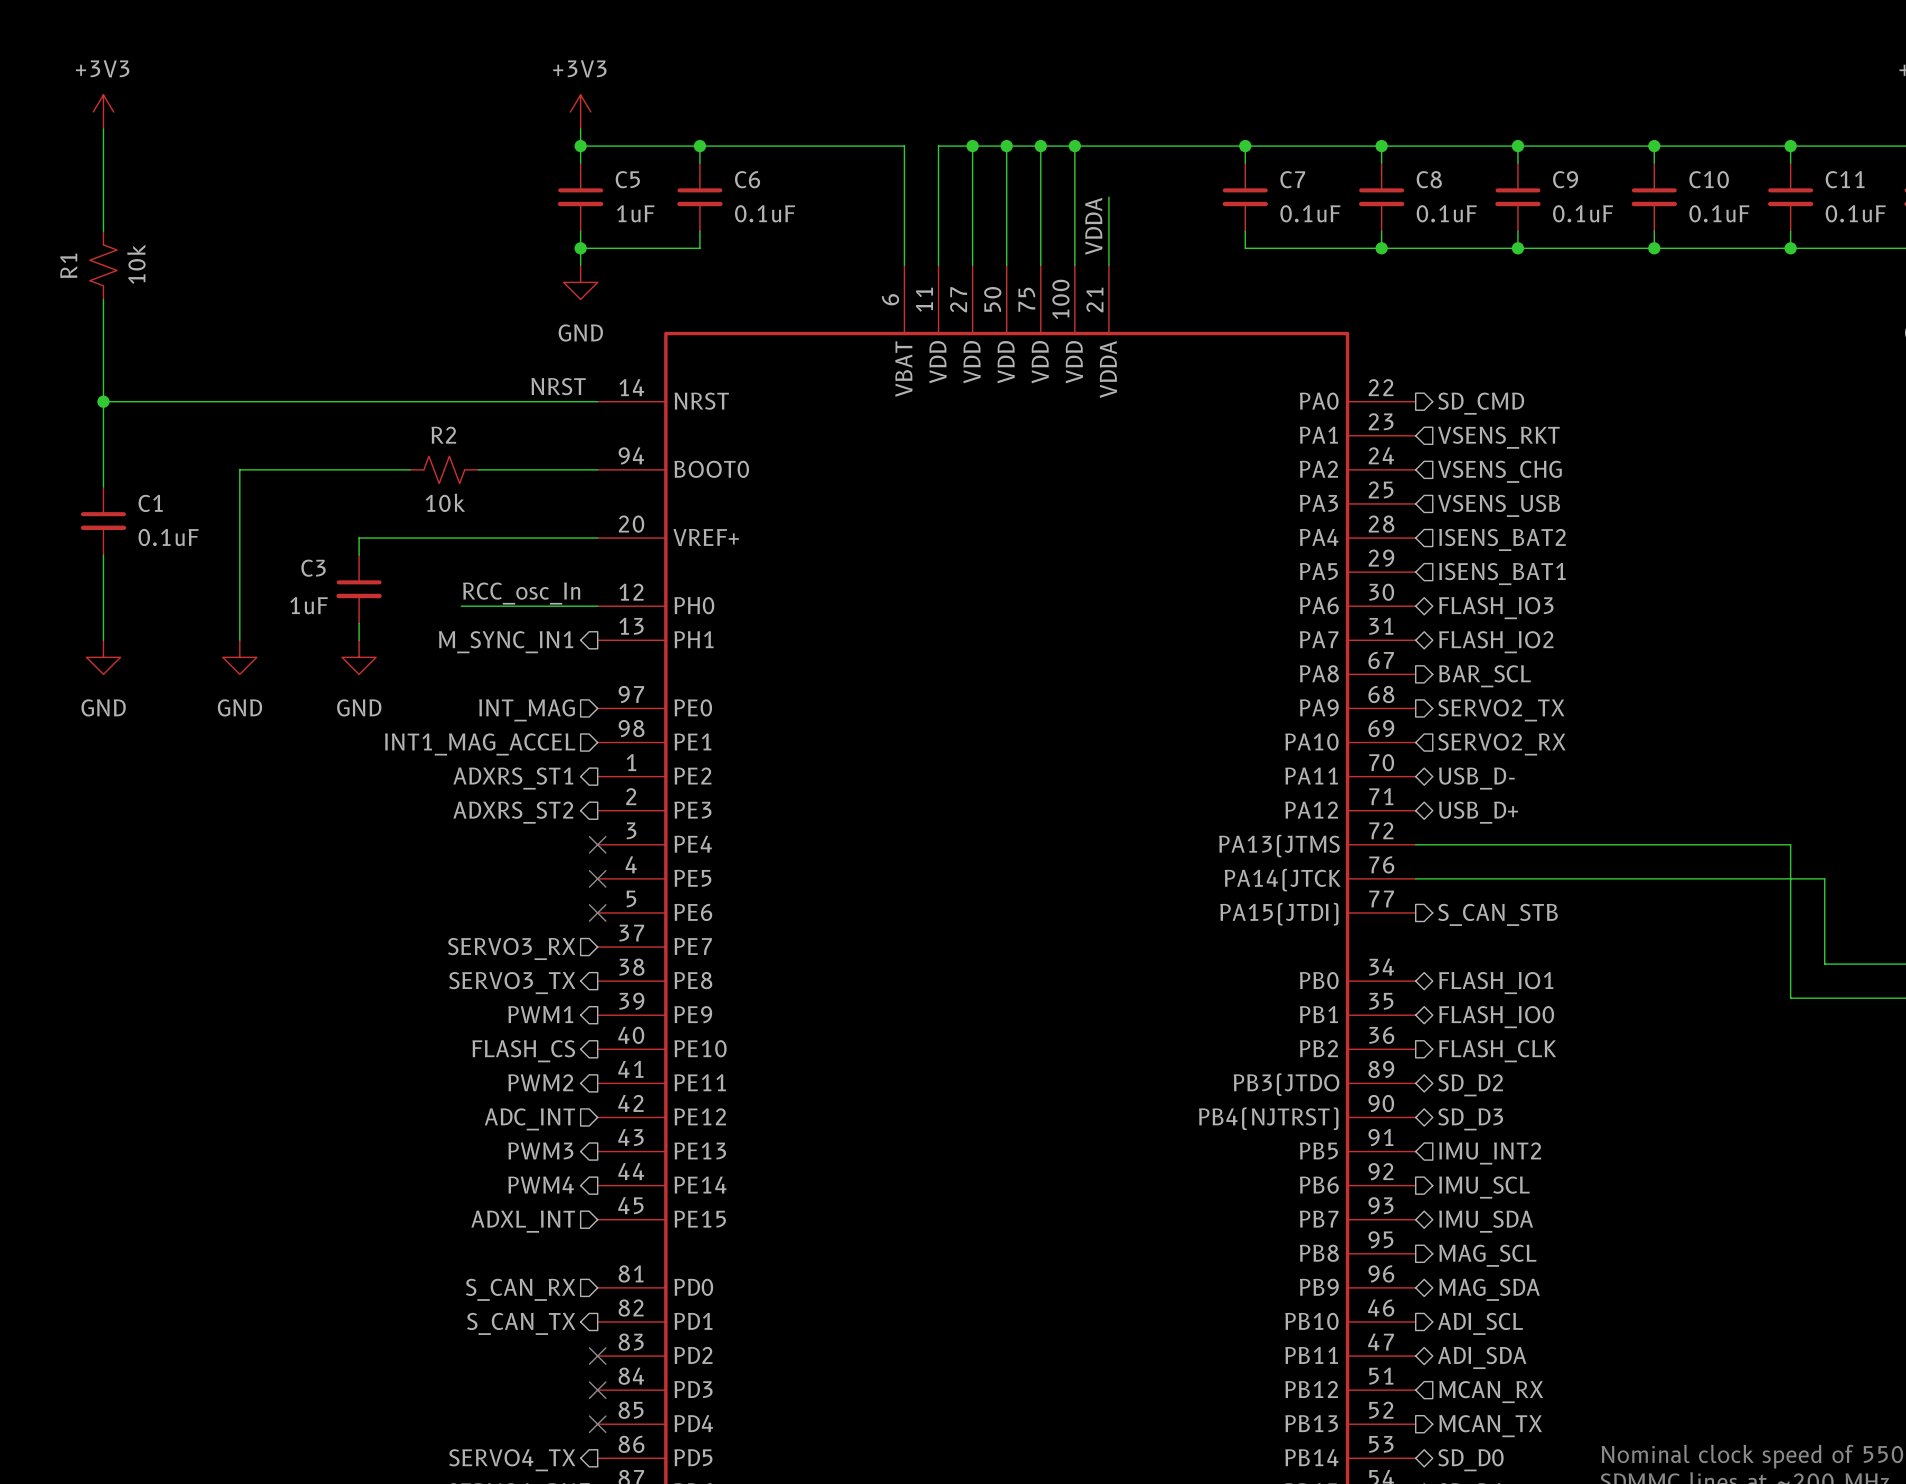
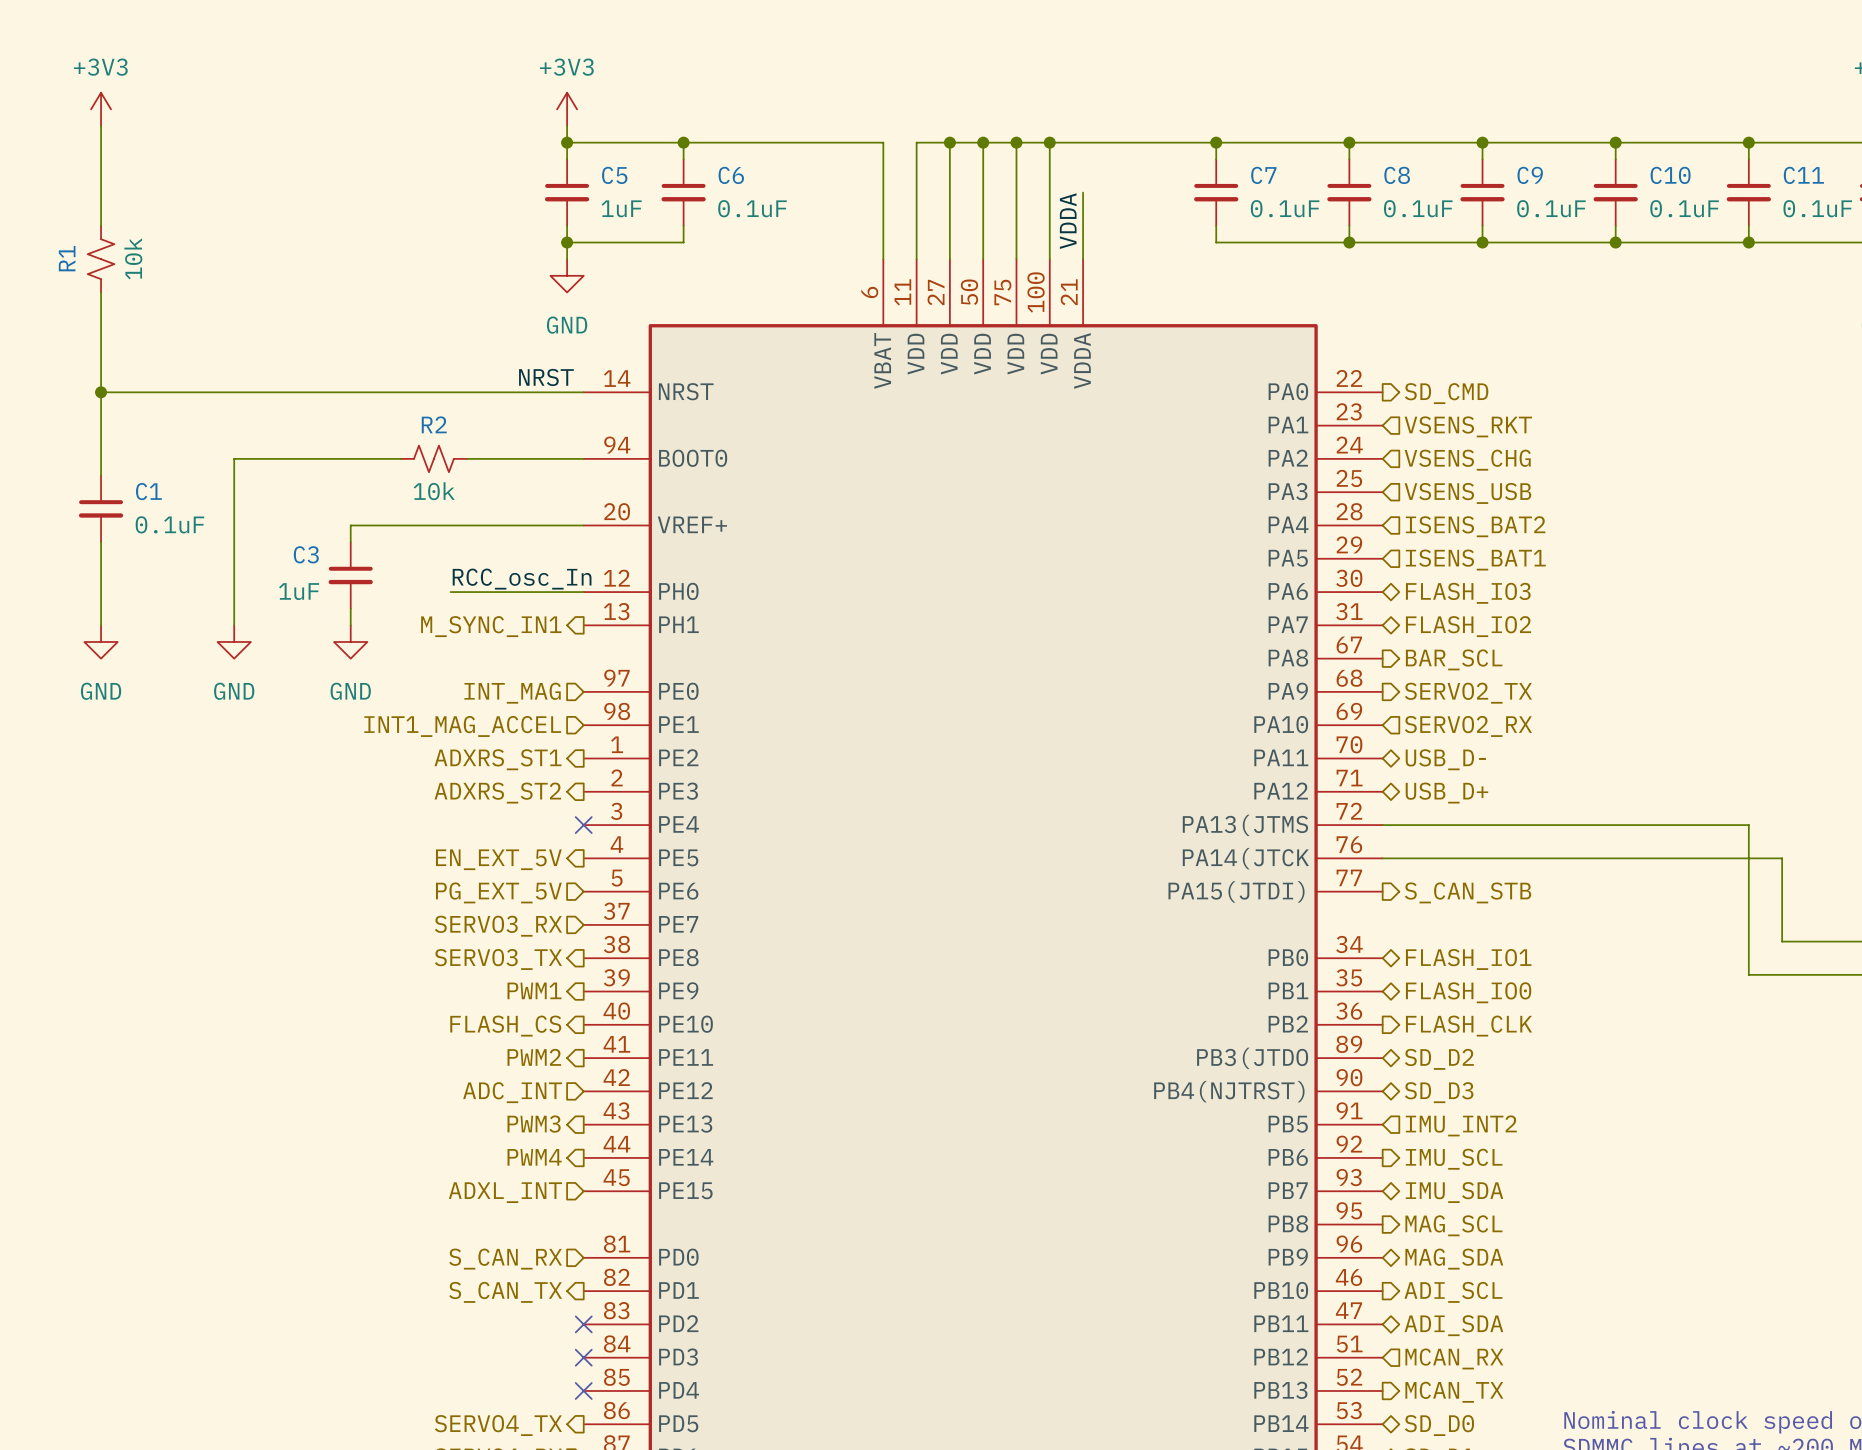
no-connect mark: (597, 878) -> none
hierarchical label: none -> EN_EXT_5V (498, 859)
no-connect mark: (597, 912) -> none
hierarchical label: none -> PG_EXT_5V (498, 892)

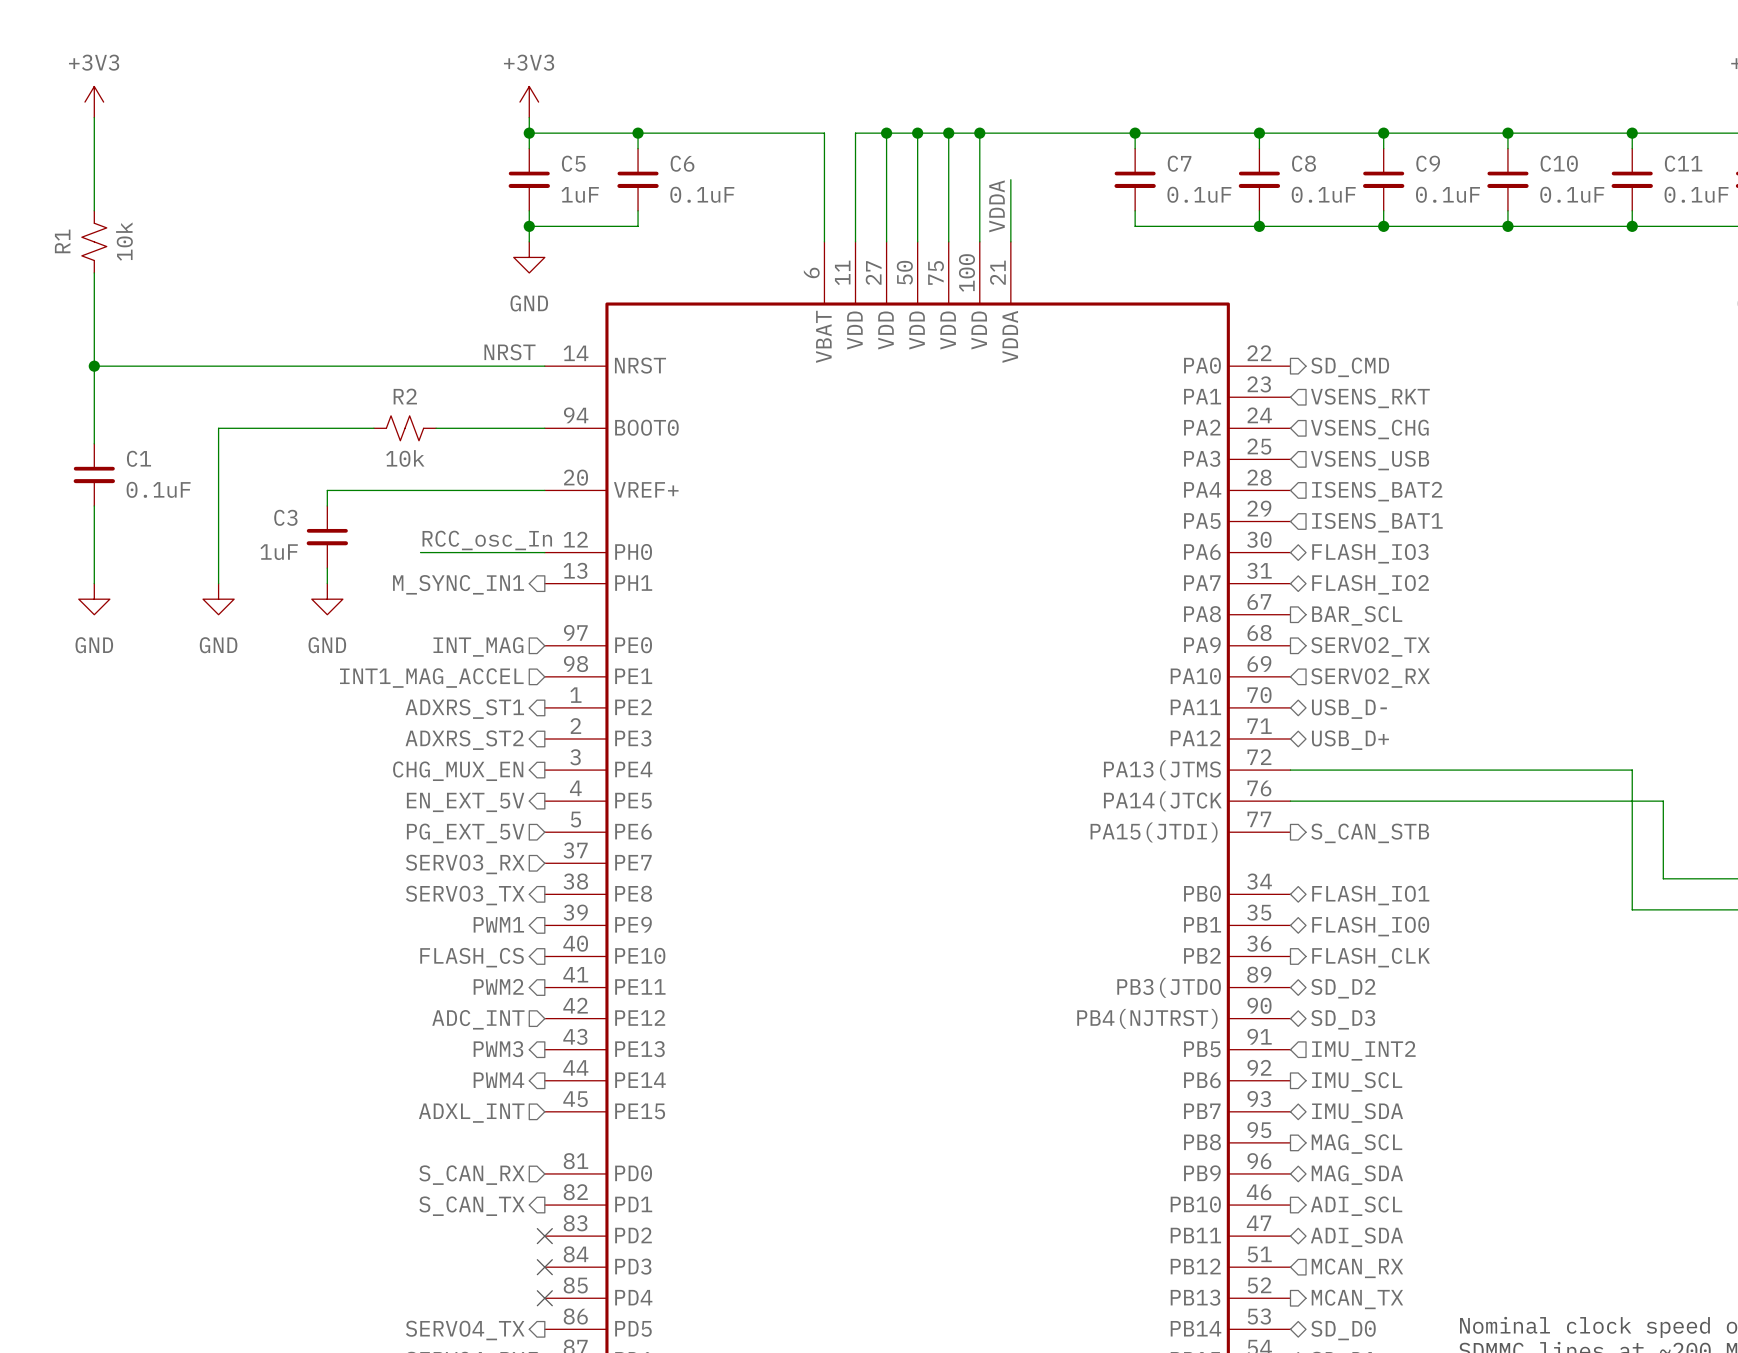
no-connect mark: (583, 825) -> none
hierarchical label: none -> CHG_MUX_EN (458, 771)

